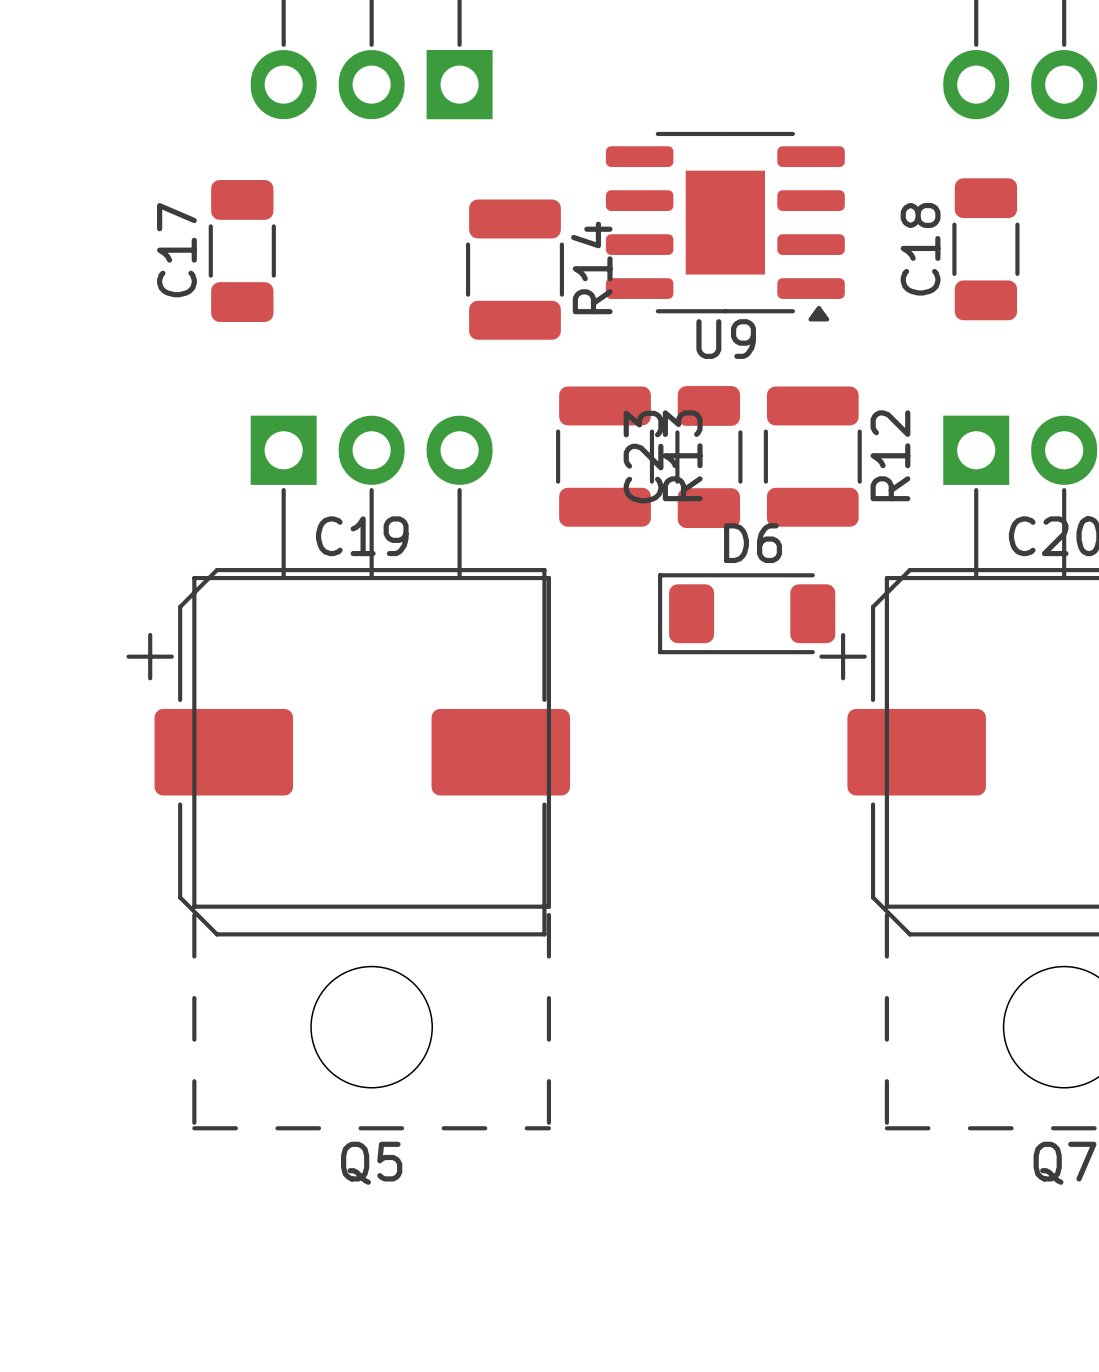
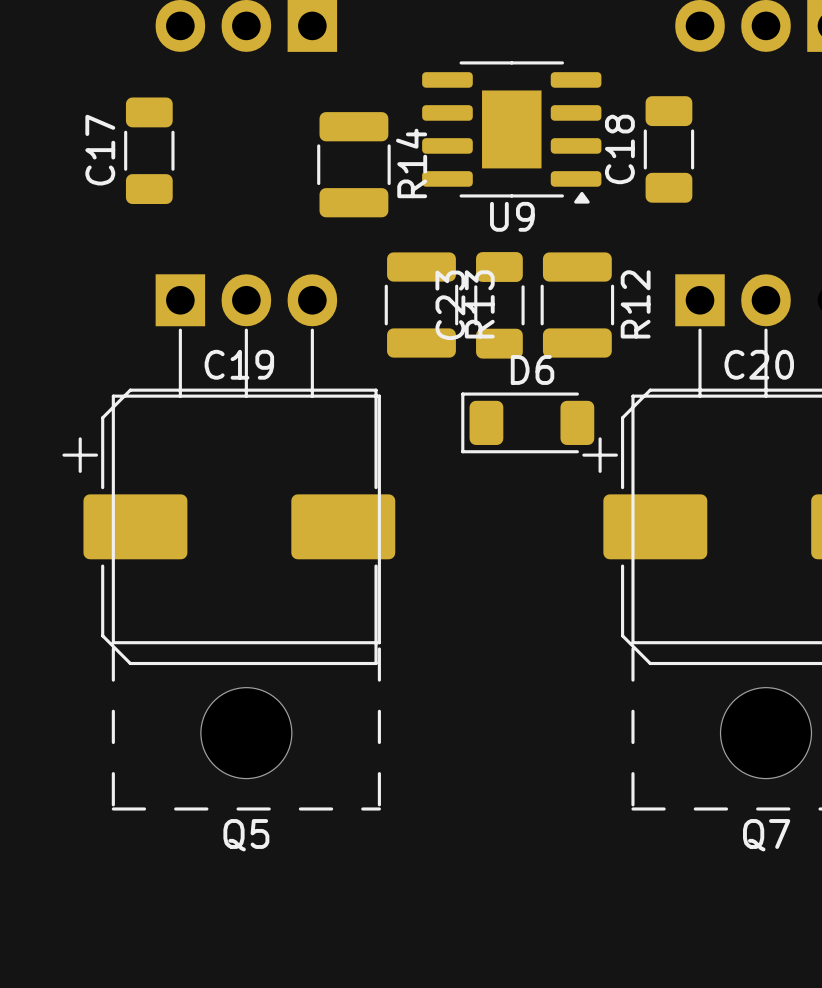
C18 position: (985, 249) -> (668, 149)

